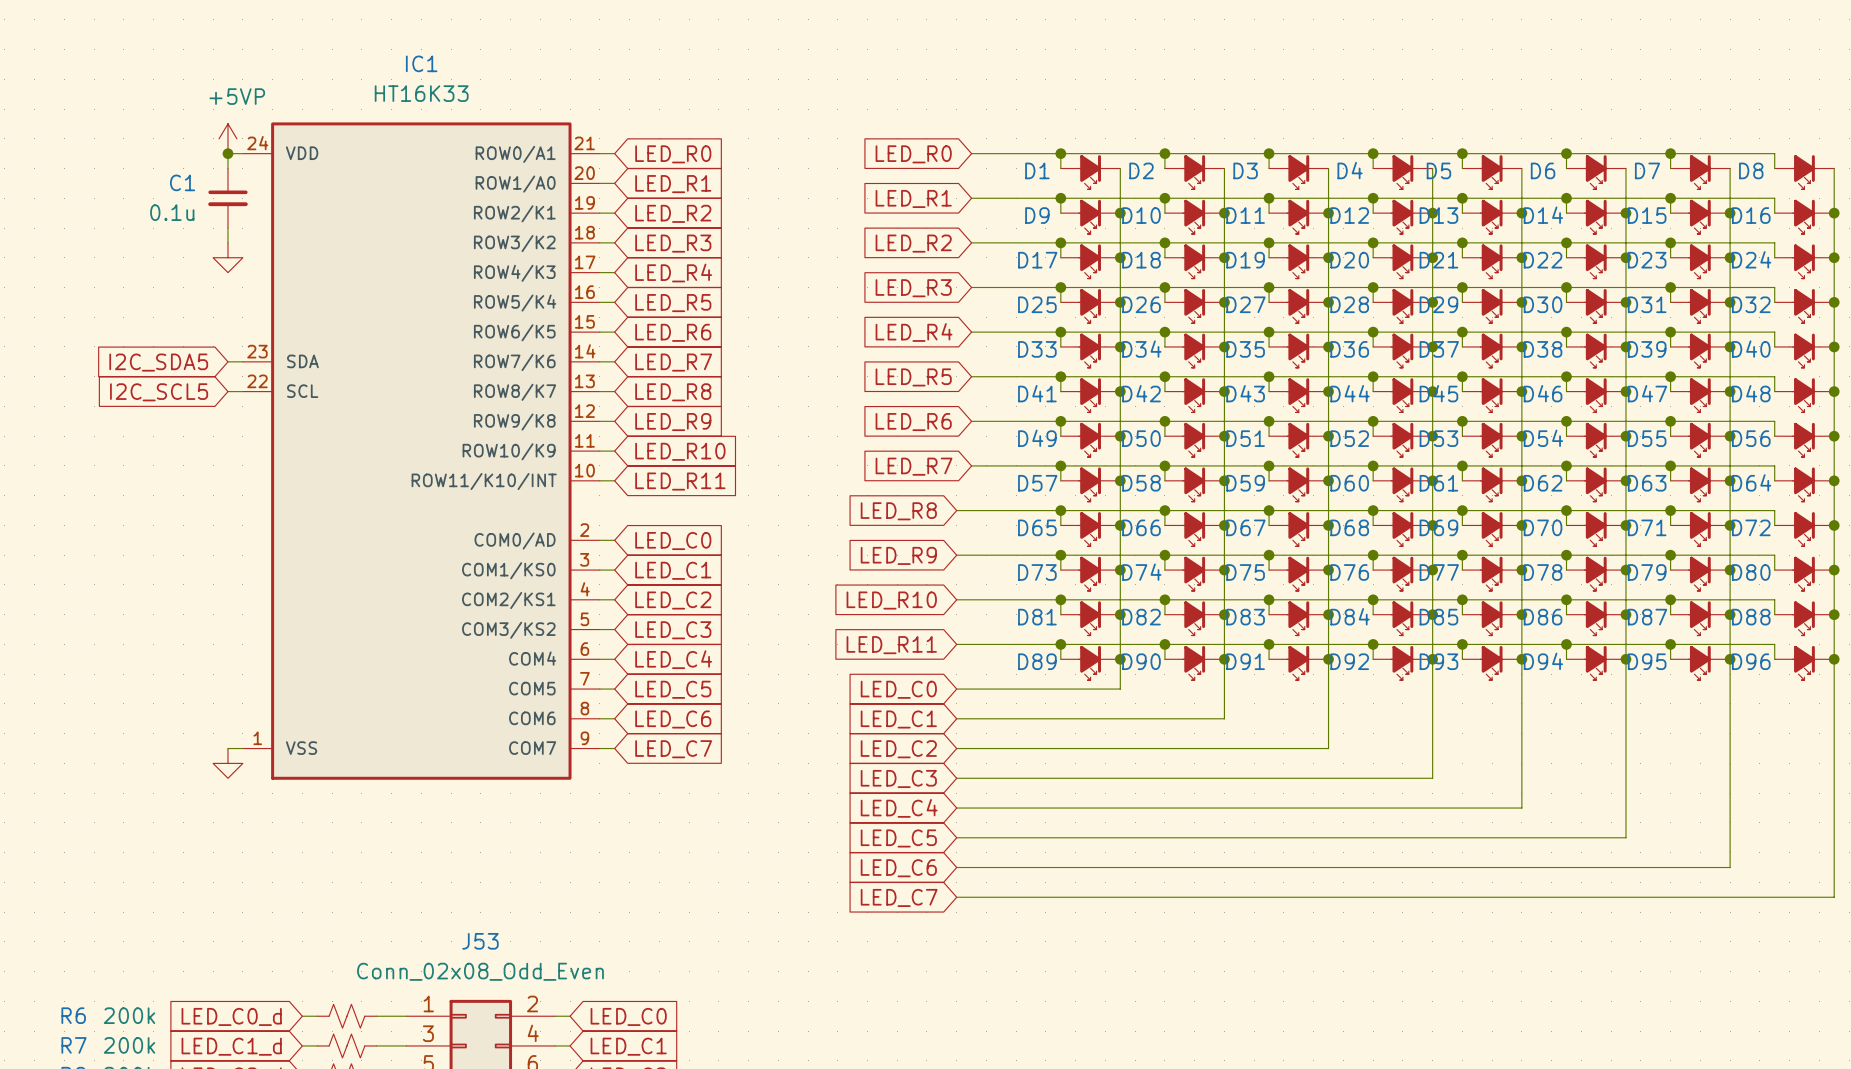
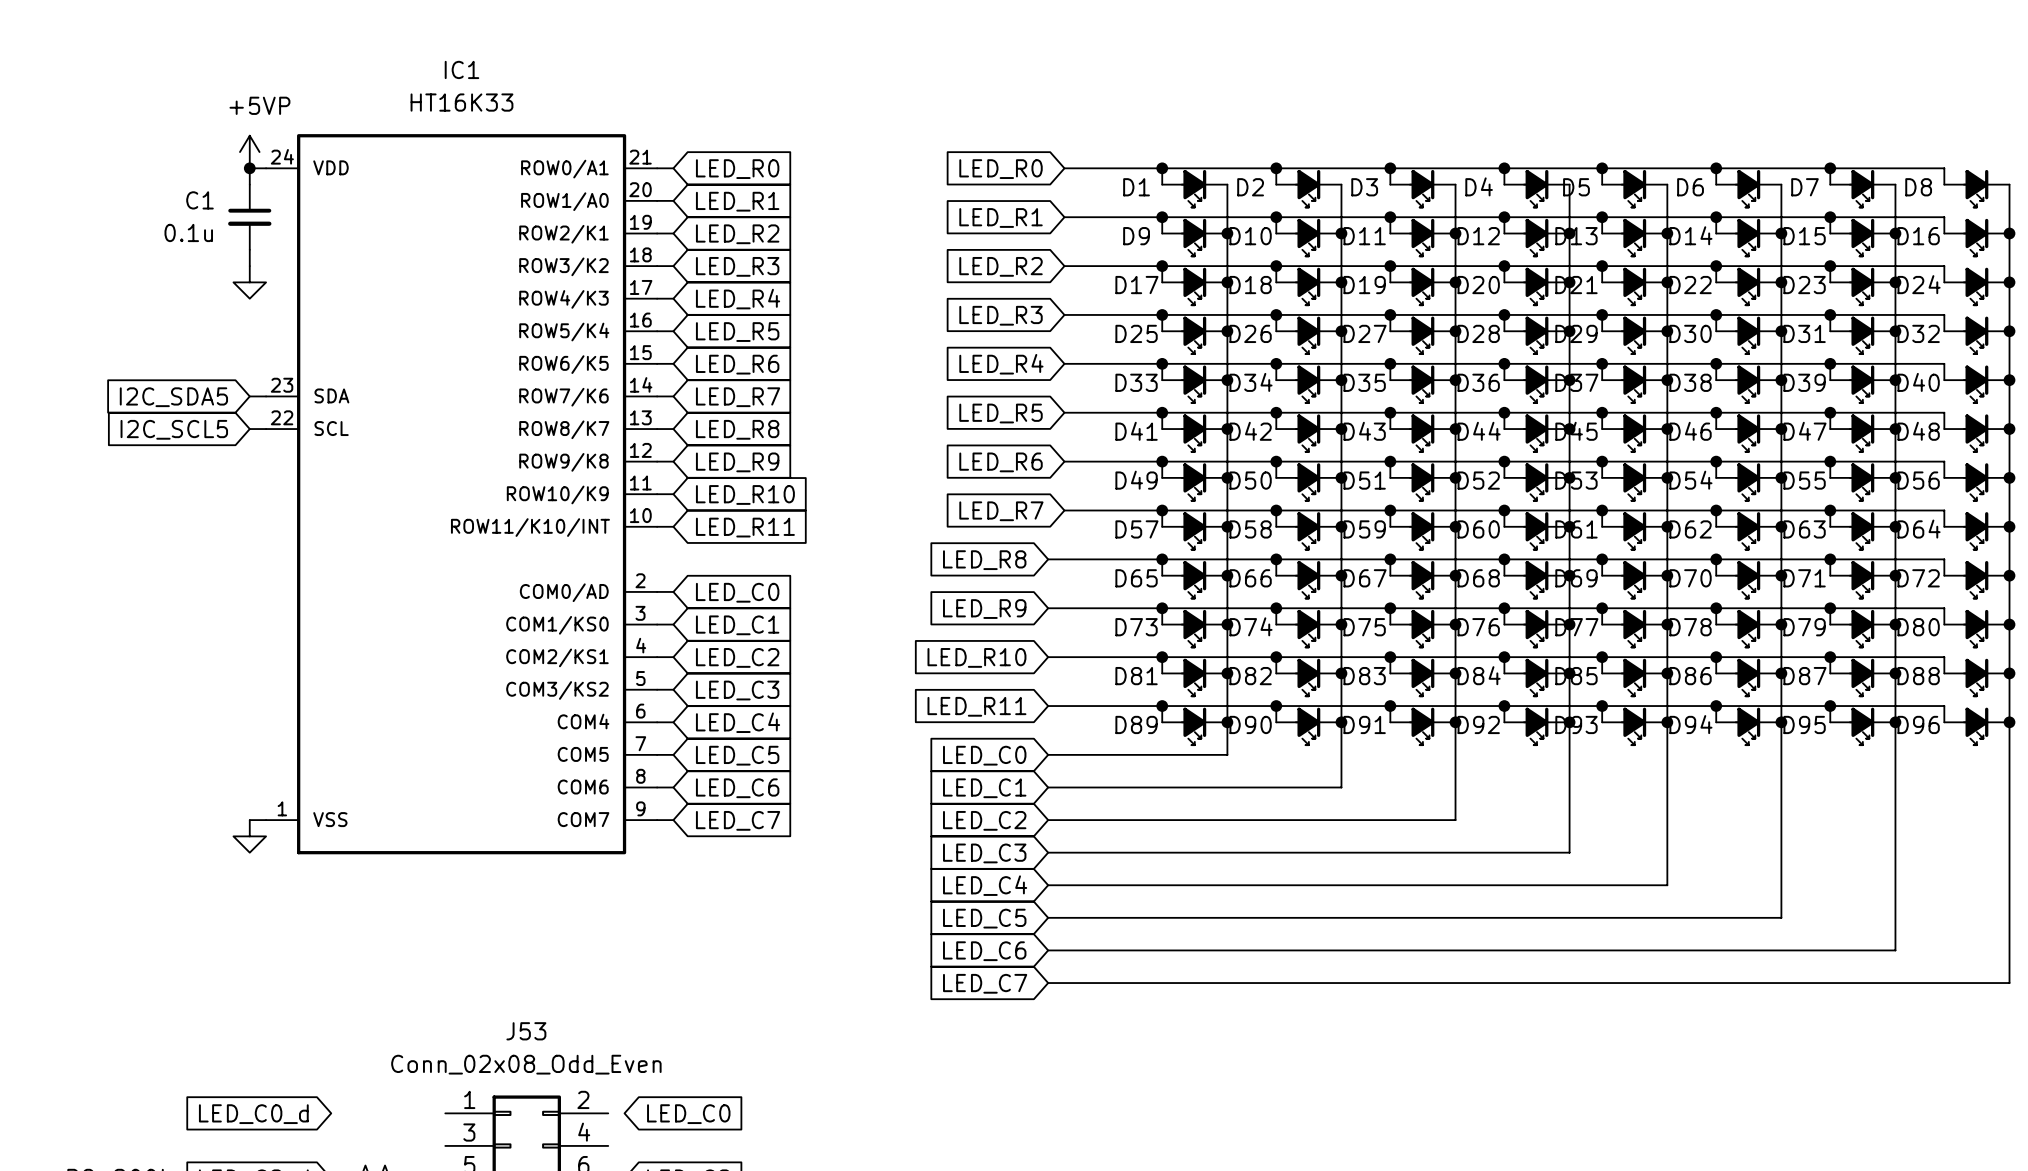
wire: (302, 1016) (317, 1016) -> none
R6: 200k (346, 1016) -> none
wire: (376, 1016) (406, 1016) -> none
wire: (555, 1016) (570, 1016) -> none
wire: (302, 1045) (317, 1045) -> none
R7: 200k (346, 1045) -> none
wire: (376, 1045) (406, 1045) -> none
wire: (555, 1045) (570, 1045) -> none
global label: LED_C1_d (231, 1046) -> none
global label: LED_C1 (628, 1046) -> none

